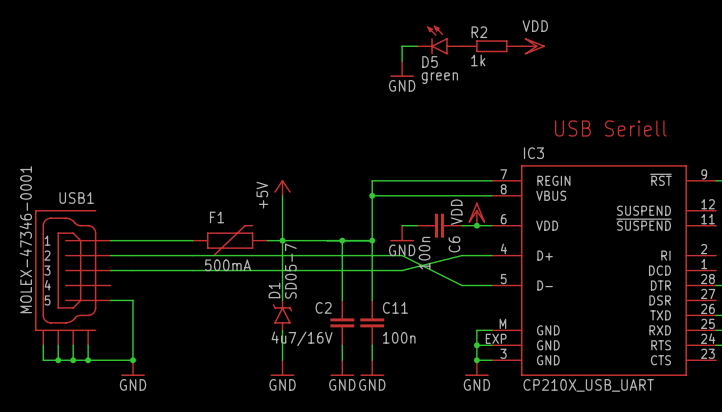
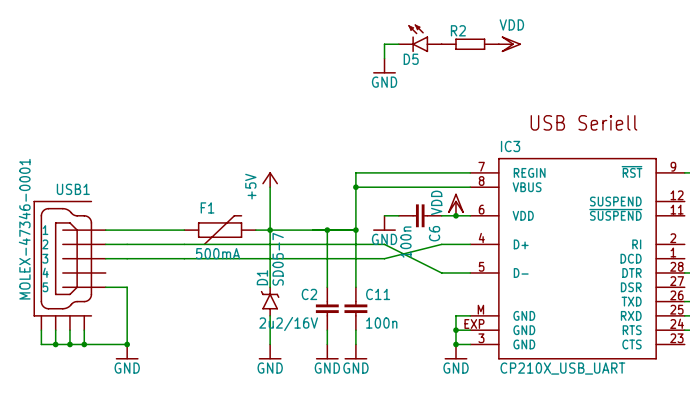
R2 value: 1k (478, 60) -> none
D5 value: green (439, 78) -> none
C2 value: 4u7/16V (302, 338) -> 2u2/16V (288, 323)

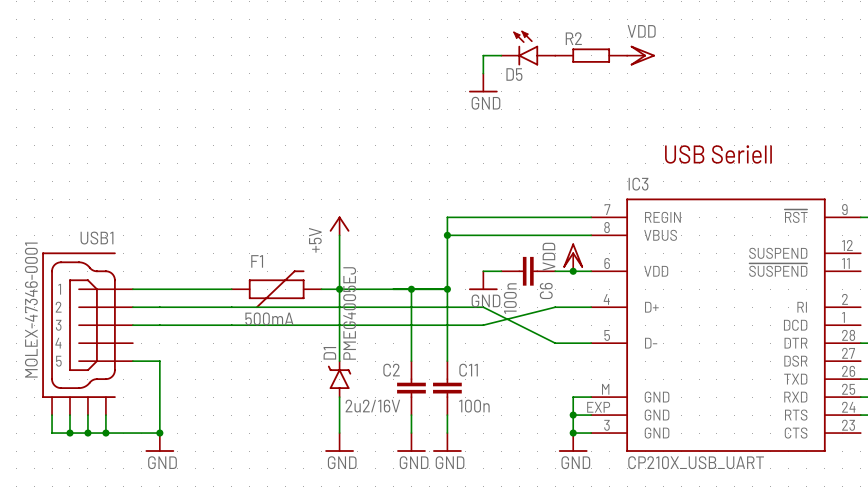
D1 value: SD05-7 (278, 259) -> PMEG4005EJ (349, 313)

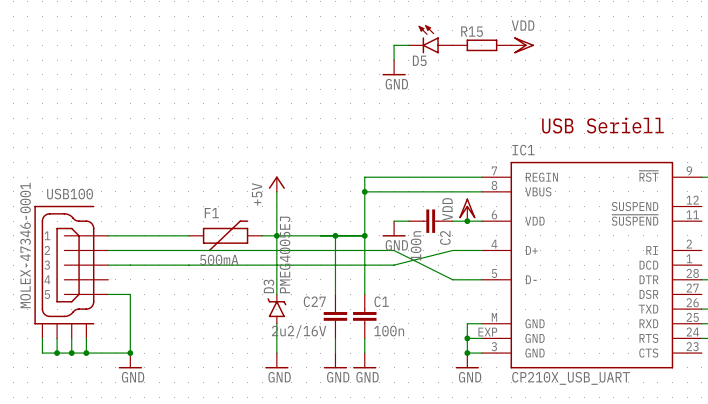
R2 name: R2 (573, 38) -> R15 (472, 31)
IC3 name: IC3 (638, 184) -> IC1 (523, 150)
USB1 name: USB1 (97, 238) -> USB100 (70, 194)
C6 name: C6 (546, 290) -> C2 (445, 237)
D1 name: D1 (329, 353) -> D3 (268, 286)
C2 name: C2 (391, 370) -> C27 (314, 301)
C11 name: C11 (468, 370) -> C1 (381, 301)

